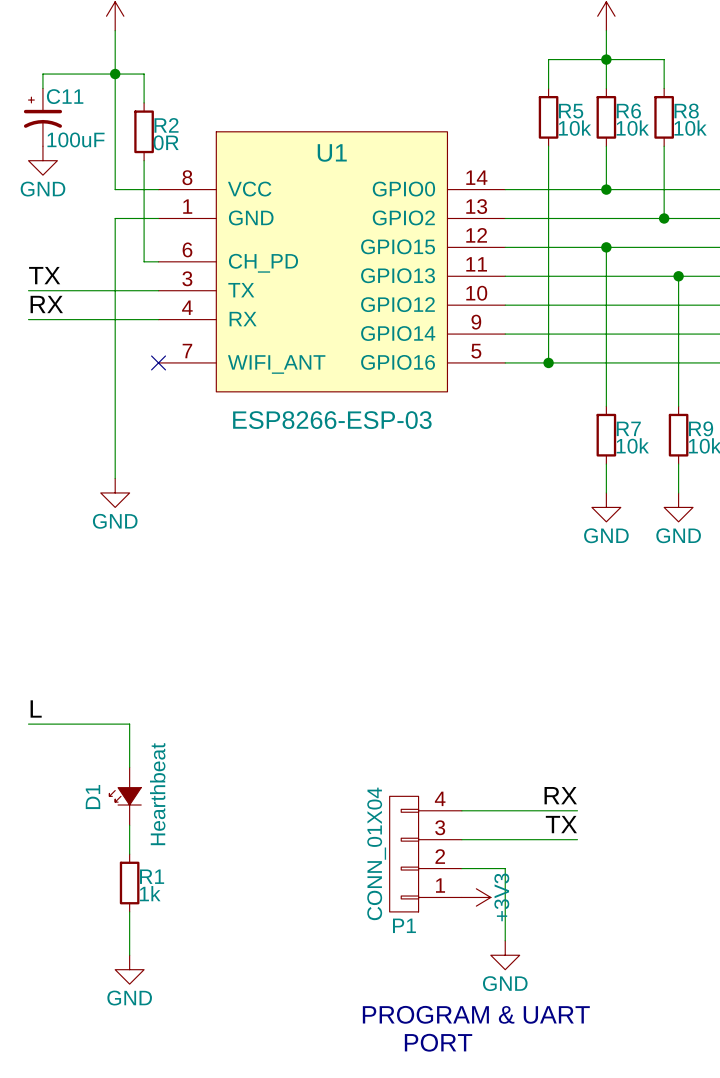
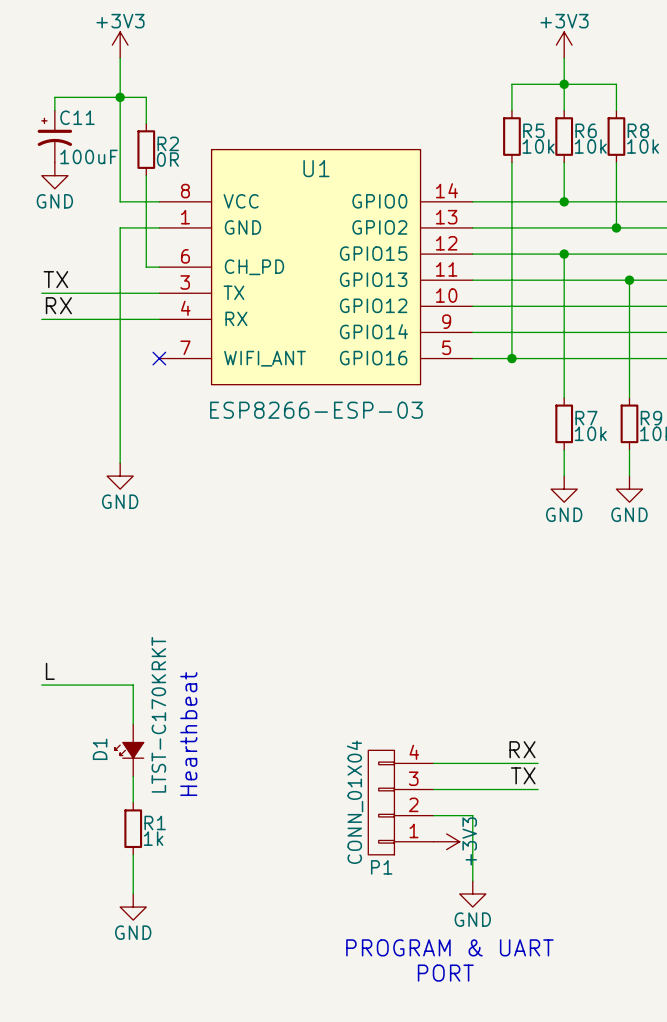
text: none -> Hearthbeat (188, 734)
D1 value: Hearthbeat (157, 794) -> LTST-C170KRKT (158, 714)

